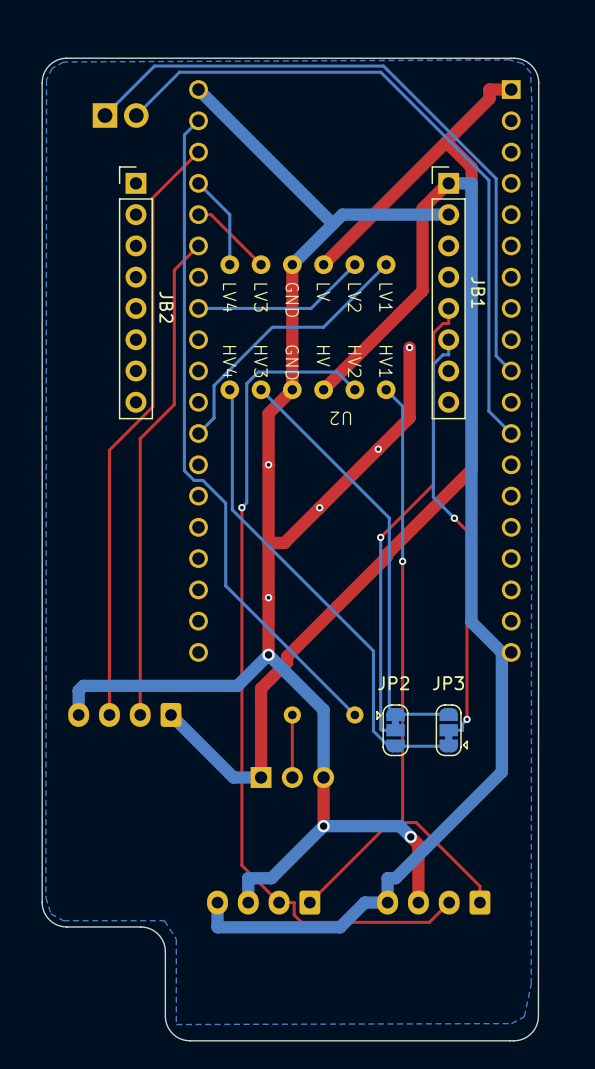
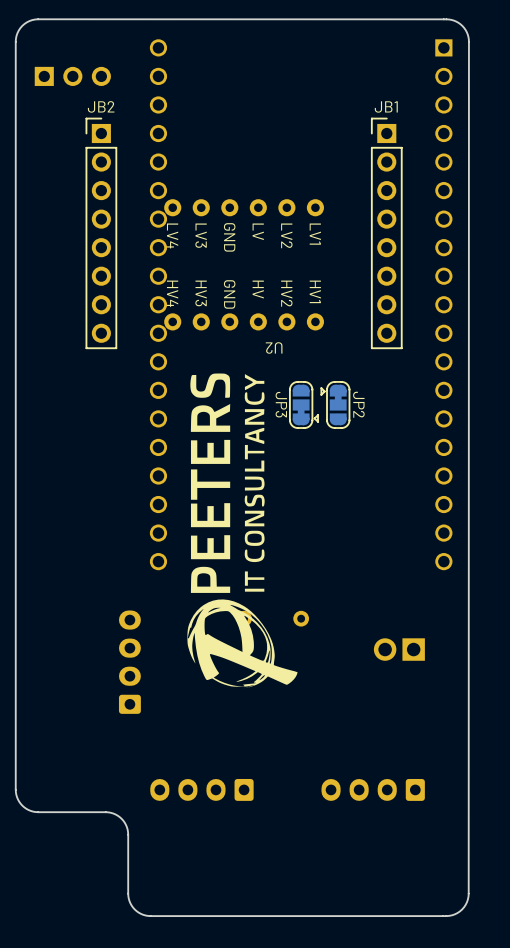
bottom zone outline: (509, 59) (522, 63) (530, 72) (531, 101) (531, 984) (524, 1016) (511, 1023) (176, 1024) (176, 939) (164, 920) (63, 920) (50, 913) (45, 897) (46, 79) (52, 68) (63, 62) (509, 59) -> none
bottom track: (198, 89) (332, 224) -> none
top track: (511, 89) (489, 89) (489, 98) (323, 264) -> none
bottom track: (105, 115) (154, 66) (383, 66) (496, 178) (496, 355) (511, 370) -> none
part: (120, 115) -> none
bottom track: (136, 115) (179, 72) (380, 72) (488, 180) (488, 411) (511, 433) -> none
part: none -> (72, 76)
bottom track: (198, 120) (184, 134) (184, 470) (194, 480) (202, 480) (225, 503) (225, 585) (354, 714) -> none
top track: (446, 142) (471, 167) (471, 469) (287, 656) (287, 662) (261, 688) (261, 777) -> none
top track: (198, 152) (152, 197) (152, 406) (109, 450) (109, 714) -> none
bottom track: (198, 183) (229, 214) (229, 264) -> none
top track: (448, 183) (422, 208) (422, 290) (323, 389) -> none
bottom track: (448, 183) (471, 183) (471, 622) (501, 652) -> none
top track: (198, 214) (211, 214) (261, 264) -> none
bottom track: (448, 214) (342, 214) (292, 264) -> none
top track: (198, 245) (174, 270) (174, 404) (140, 438) (140, 714) -> none
top track: (292, 264) (292, 389) (268, 413) (268, 654) -> none
bottom track: (354, 264) (311, 308) (198, 308) -> none
bottom track: (386, 264) (323, 327) (272, 327) (214, 385) (214, 417) (198, 433) -> none
JB1 name rotation: 0° (478, 292) -> 90° counterclockwise (386, 106)
JB1 name position: JB1 (478, 292) -> JB1 (386, 106)
JB2 name rotation: 0° (166, 307) -> 90° counterclockwise (101, 106)
JB2 name position: JB2 (166, 307) -> JB2 (101, 106)
top track: (448, 308) (448, 323) (443, 323) (433, 332) (433, 484) (380, 537) -> none
U2 position: (307, 327) -> (244, 264)
bottom track: (448, 339) (448, 354) (443, 354) (433, 364) (433, 497) (454, 518) -> none
top track: (409, 347) (409, 417) (284, 542) (268, 542) -> none
via: (409, 347) -> none
bottom track: (229, 389) (232, 392) (232, 509) (373, 651) (373, 731) (388, 746) (448, 746) -> none
bottom track: (261, 389) (389, 518) (389, 708) (395, 714) (448, 714) -> none
bottom track: (354, 389) (337, 372) (258, 372) (246, 383) (246, 502) (241, 507) -> none
bottom track: (386, 389) (402, 406) (402, 561) -> none
drawing: none -> [187, 373, 298, 689]
via: (378, 449) -> none
via: (268, 464) -> none
top track: (241, 507) (241, 865) (279, 902) (294, 902) (294, 914) (301, 922) (429, 922) (449, 902) -> none
via: (241, 507) -> none
via: (319, 507) -> none
top track: (454, 518) (467, 530) (467, 719) -> none
via: (454, 518) -> none
bottom track: (380, 537) (380, 729) (395, 730) -> none
via: (380, 537) -> none
top track: (402, 561) (402, 822) -> none
via: (402, 561) -> none
via: (268, 597) -> none
bottom track: (501, 652) (501, 772) (395, 878) (387, 878) (387, 902) (364, 902) (340, 927) (217, 927) (217, 902) -> none
via: (268, 654) -> none
JP2 name rotation: 0° (393, 683) -> 90° clockwise (358, 404)
JP2 name position: JP2 (393, 683) -> JP2 (358, 404)
JP3 name rotation: 0° (448, 683) -> 90° clockwise (281, 404)
JP3 name position: JP3 (448, 683) -> JP3 (281, 404)
bottom track: (78, 714) (78, 690) (83, 685) (237, 685) (268, 654) (323, 709) (323, 777) -> none
part rotation: 0° (124, 714) -> 90° clockwise (129, 662)
bottom track: (171, 714) (233, 777) (261, 777) -> none
top track: (292, 714) (292, 777) -> none
bottom track: (467, 719) (462, 723) (462, 730) (448, 730) -> none
via: (467, 719) -> none
JP2 position: (392, 730) -> (335, 404)
JP3 position: (451, 730) -> (303, 404)
part: none -> (399, 649)
part: (292, 777) -> none
top track: (323, 777) (323, 826) -> none
via: (323, 826) -> none
top track: (410, 836) (418, 844) (418, 902) -> none
bottom track: (410, 836) (399, 826) (323, 826) (271, 878) (248, 878) (248, 902) -> none
via: (410, 836) -> none
part position: (263, 902) -> (201, 789)
top track: (479, 902) (479, 886) (416, 822) (389, 822) (309, 902) -> none

